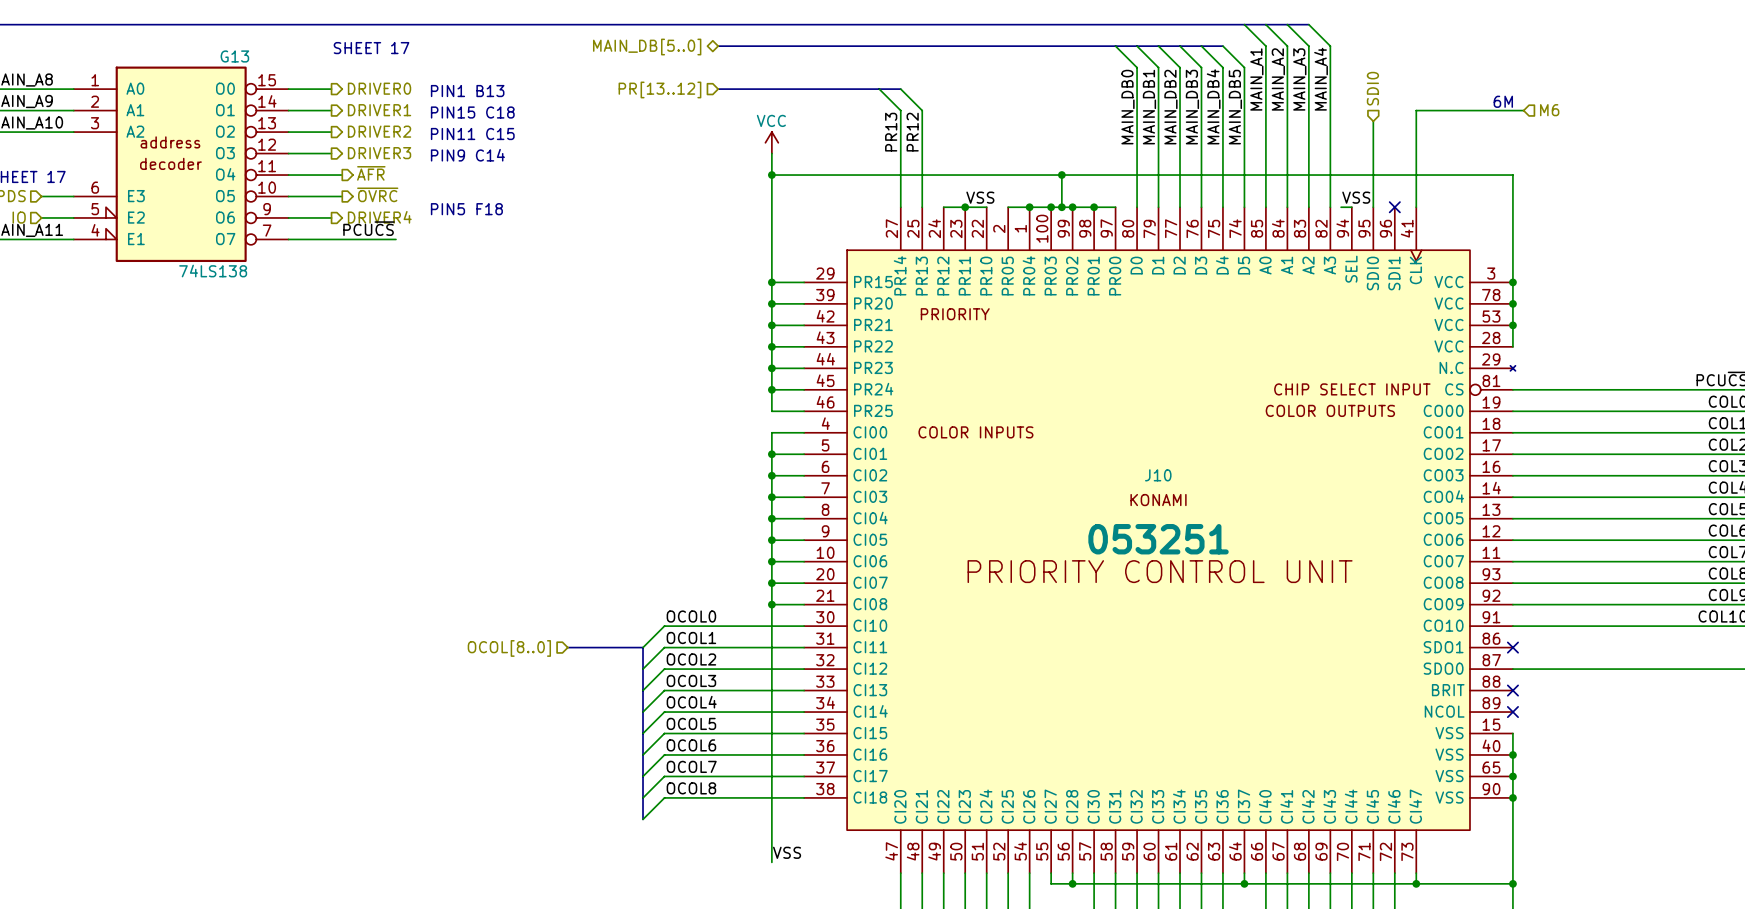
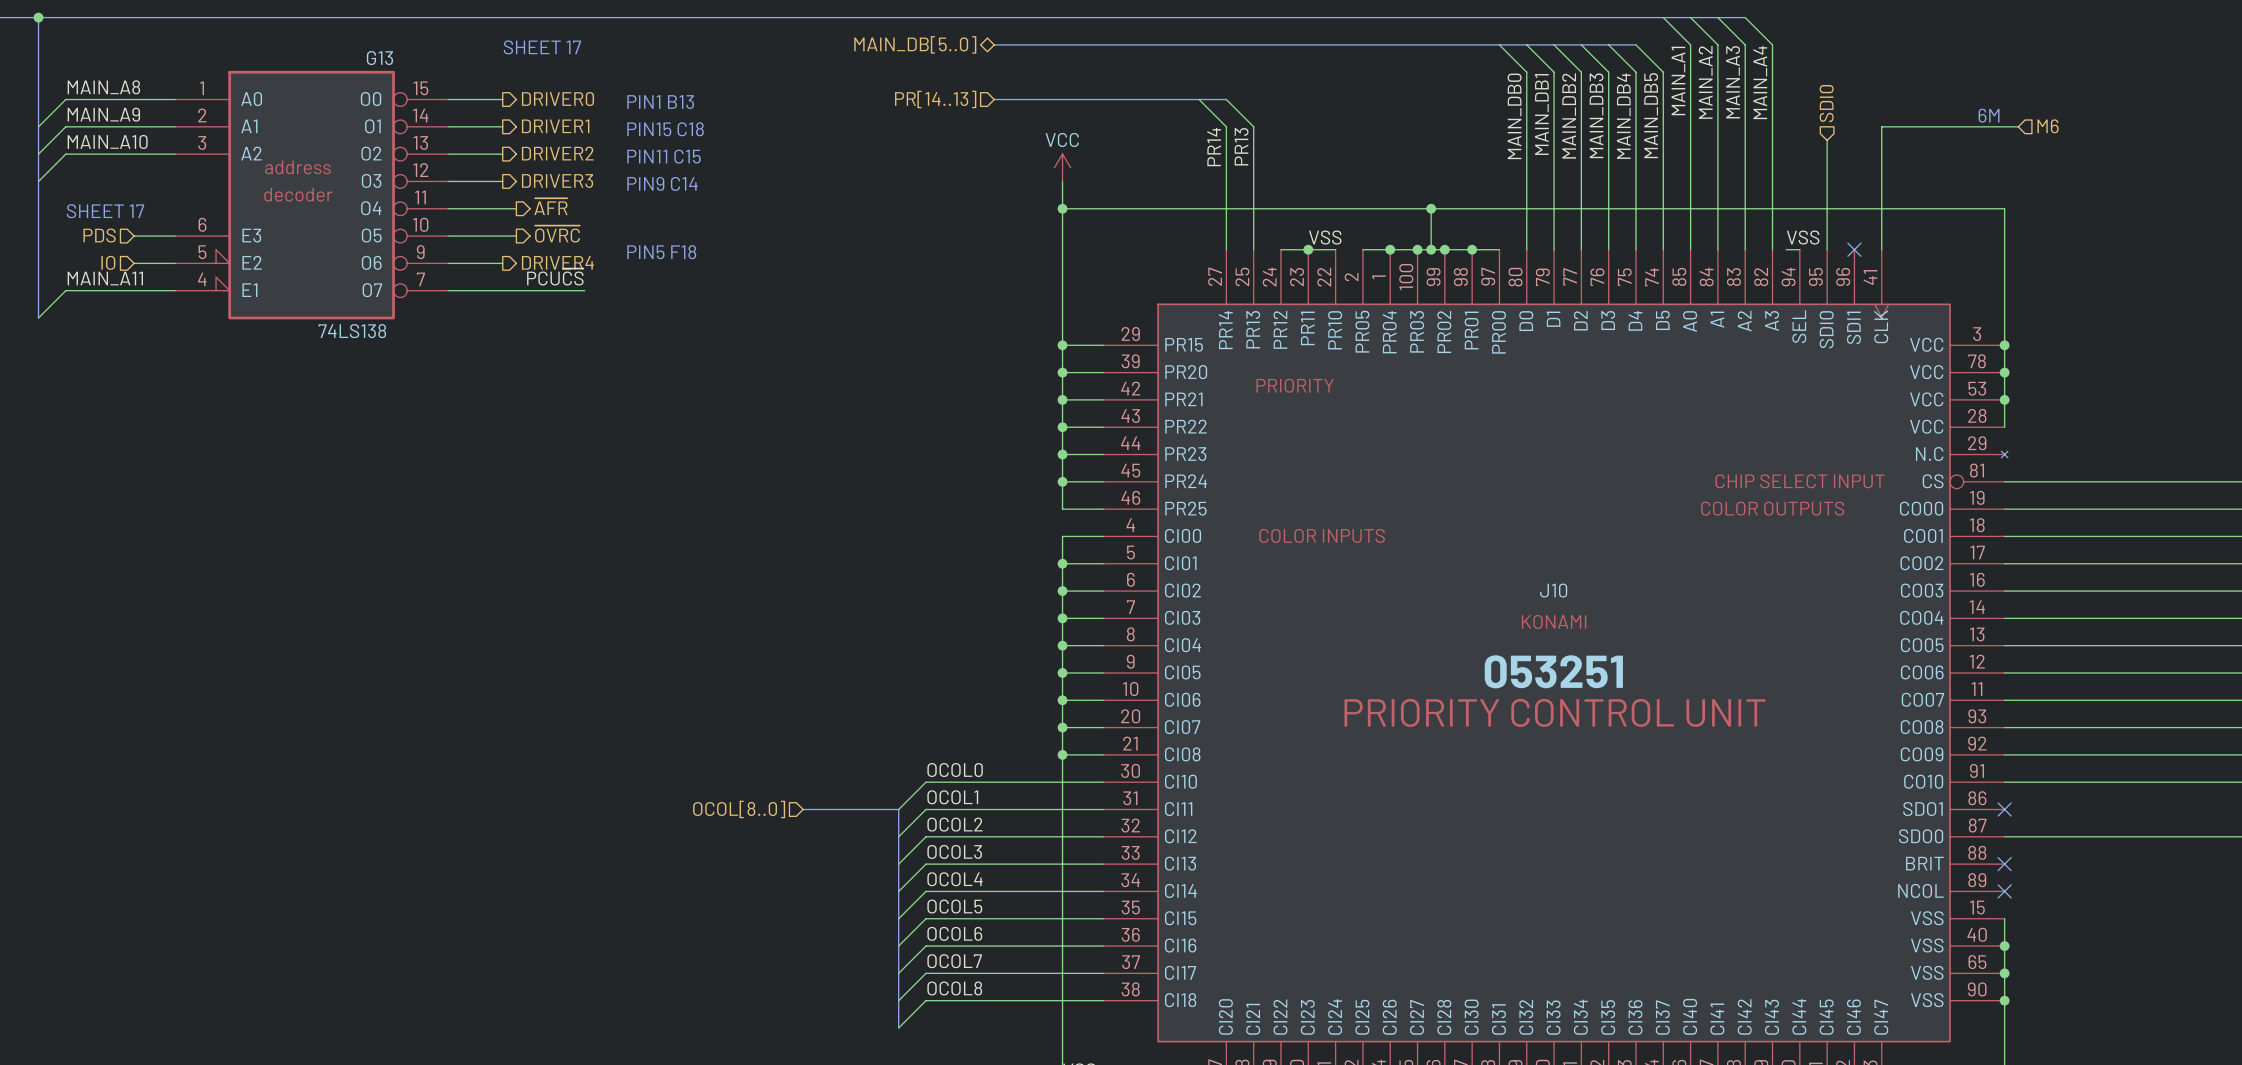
hierarchical label: PR[13..12] (659, 89) -> PR[14..13] (935, 99)
label: PR13 (891, 132) -> PR14 (1214, 147)
label: PR12 (912, 132) -> PR13 (1241, 146)

